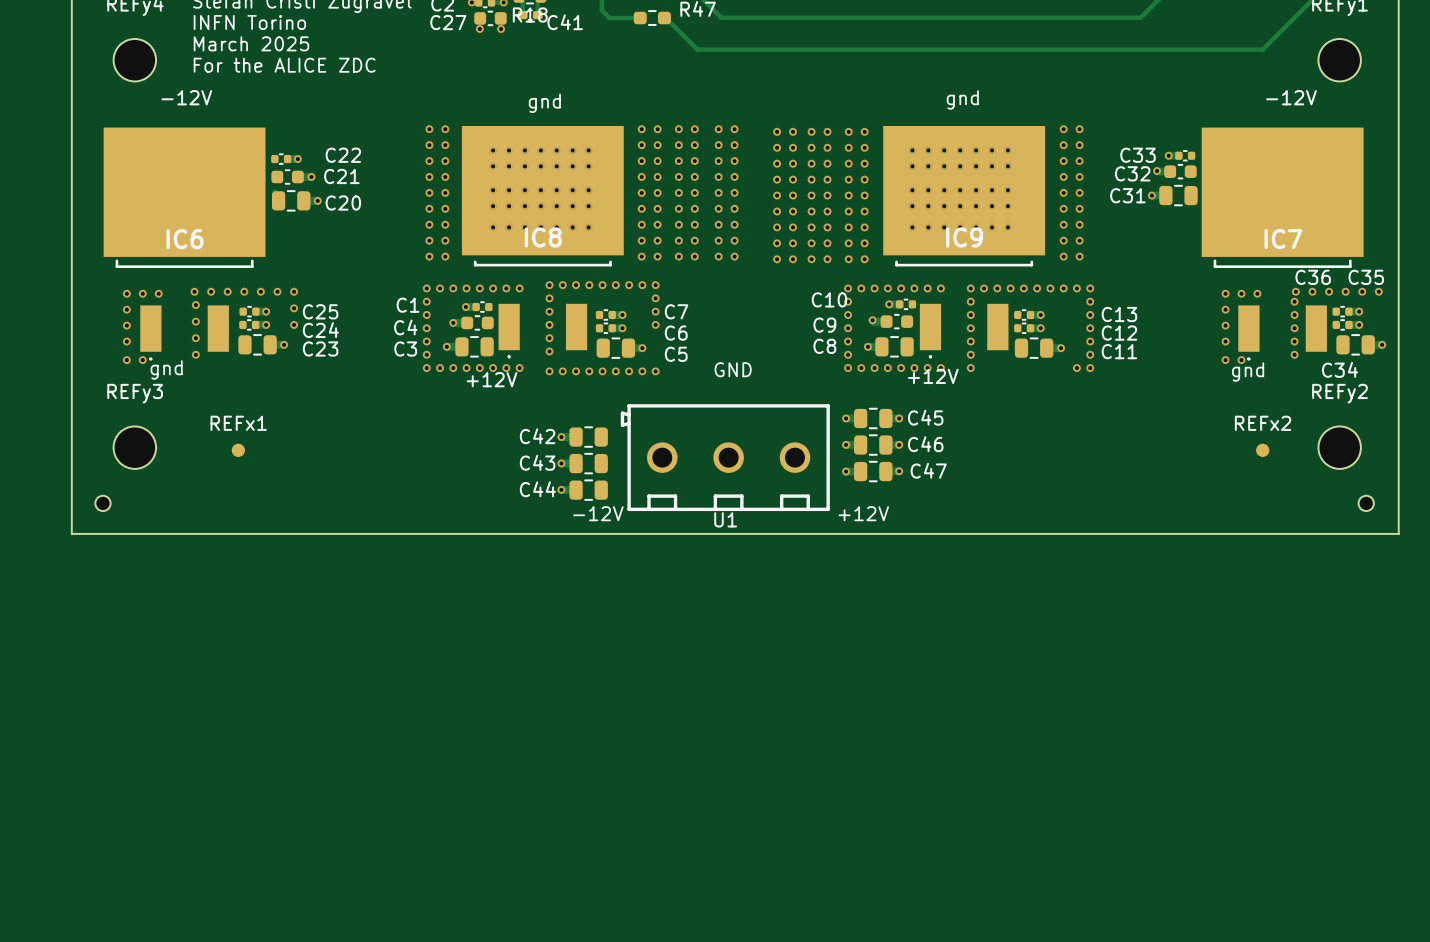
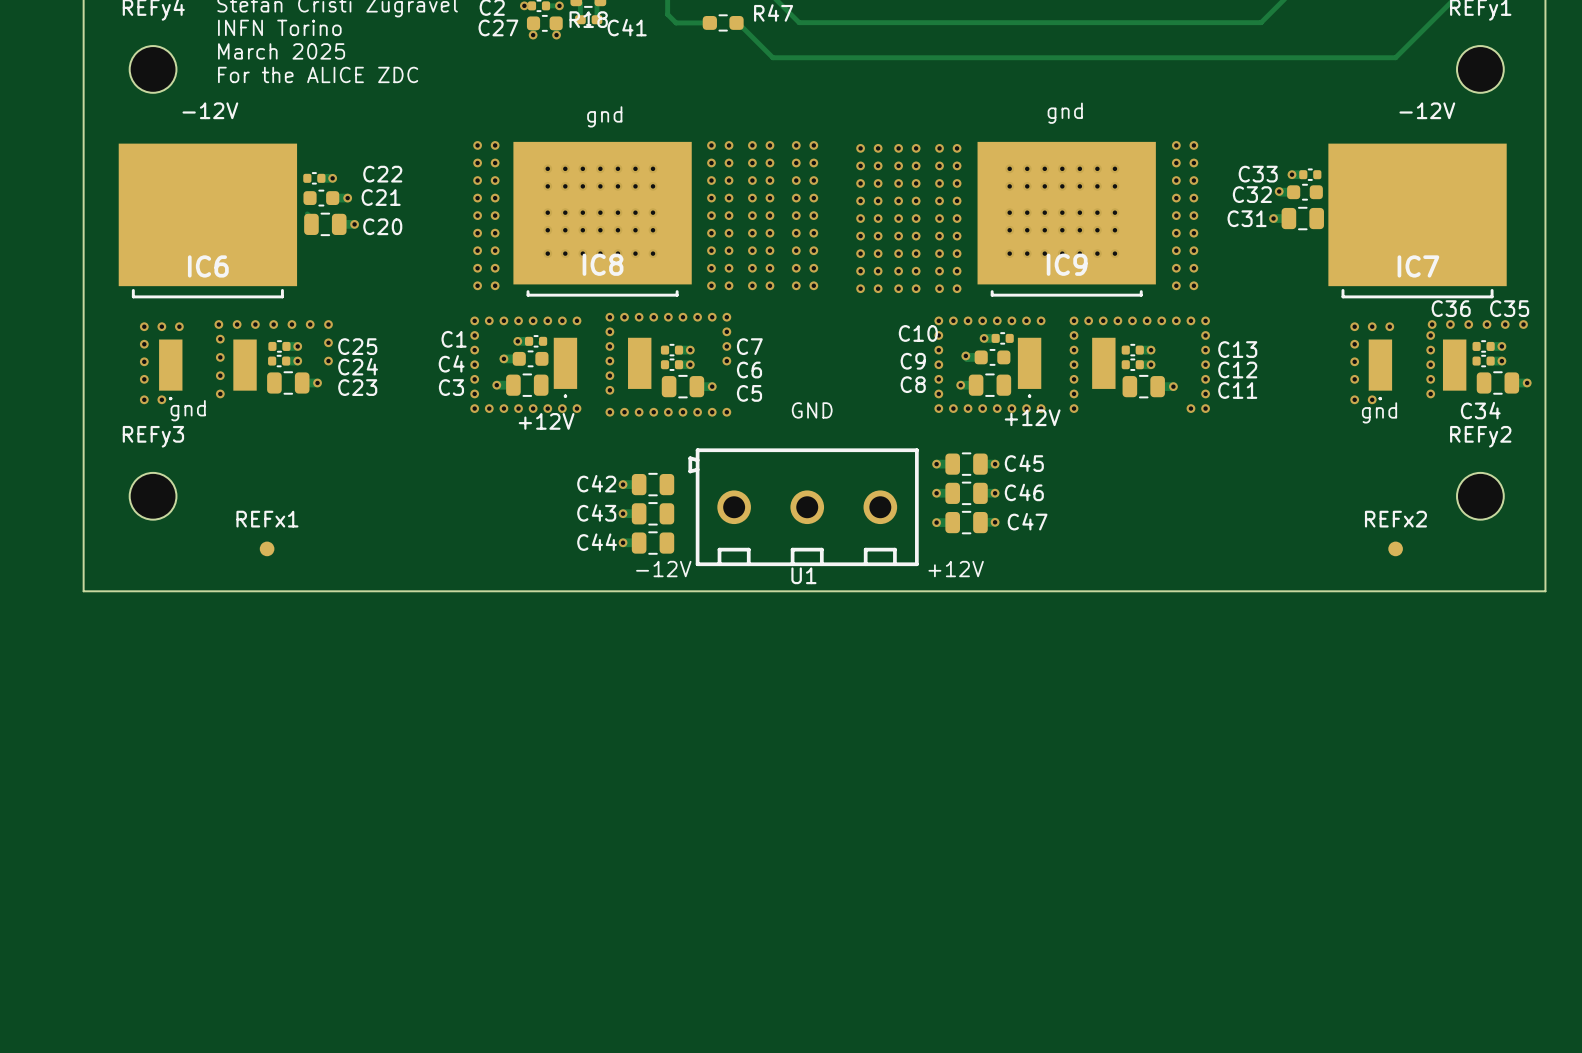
REFx1 position: (238, 450) -> (267, 548)
REFx2 position: (1262, 450) -> (1395, 548)
part: (102, 503) -> none
part: (1366, 503) -> none

